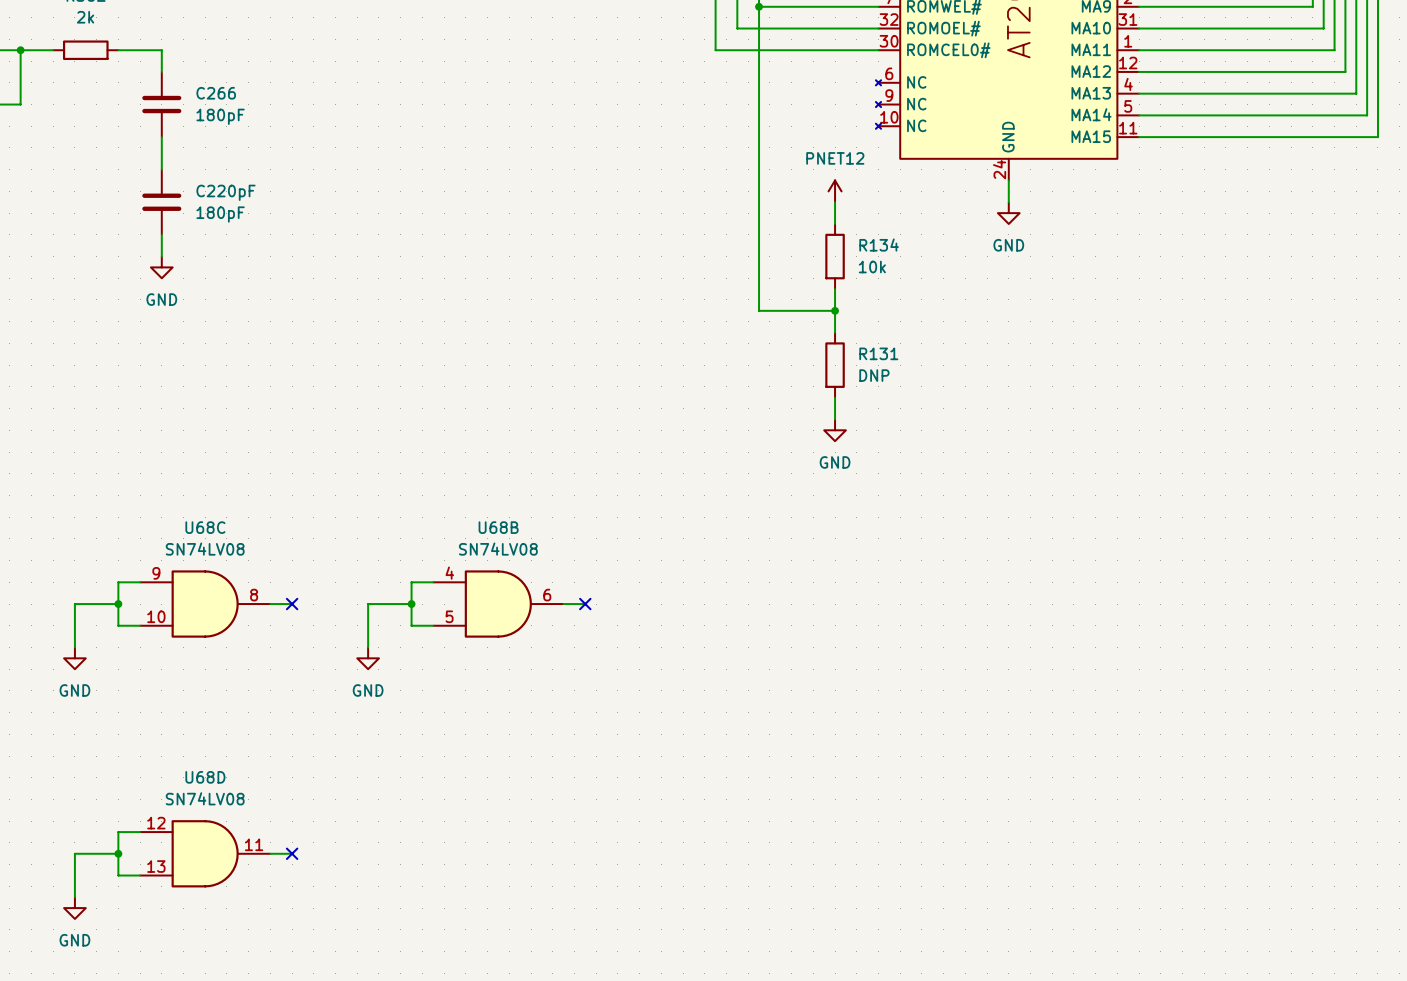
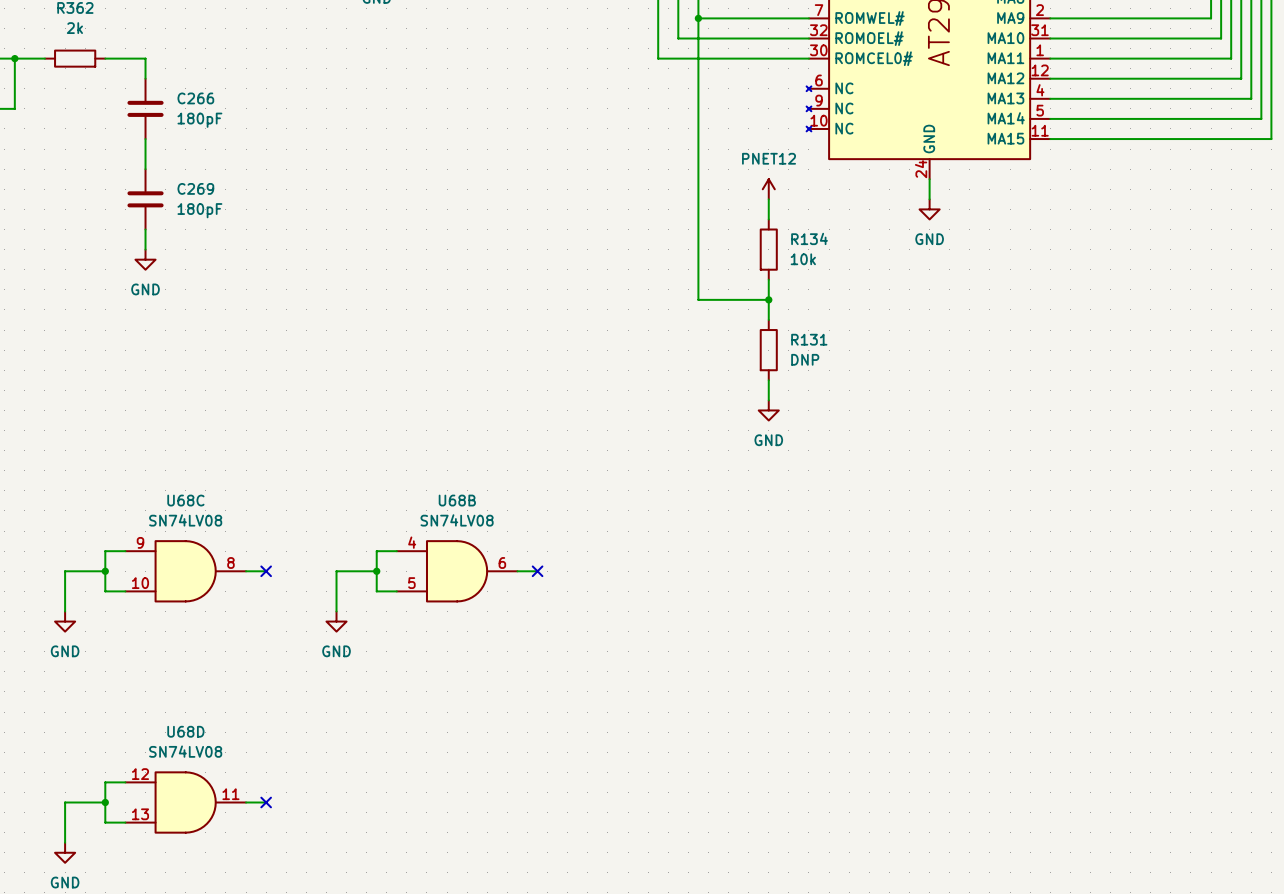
C220pF name: C220pF (226, 192) -> C269 (195, 188)

